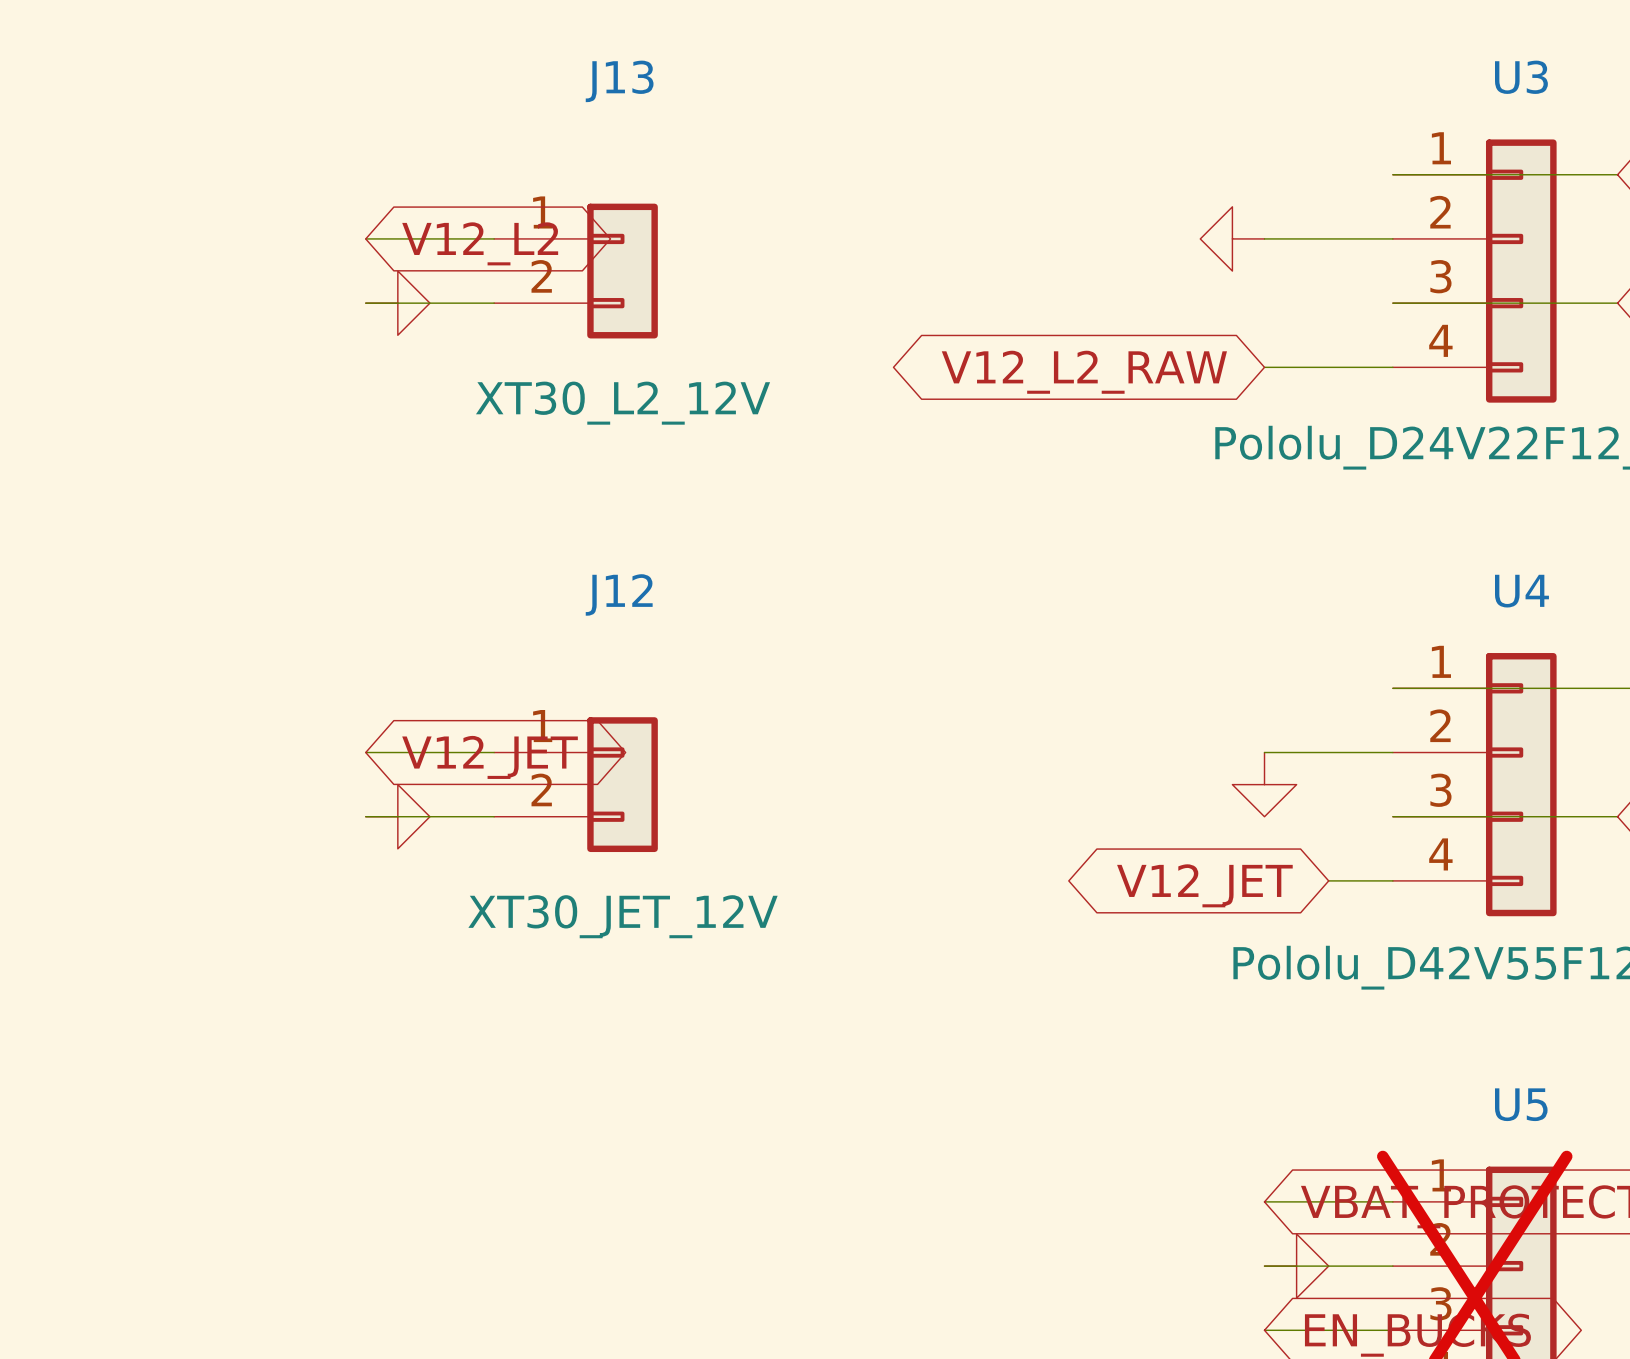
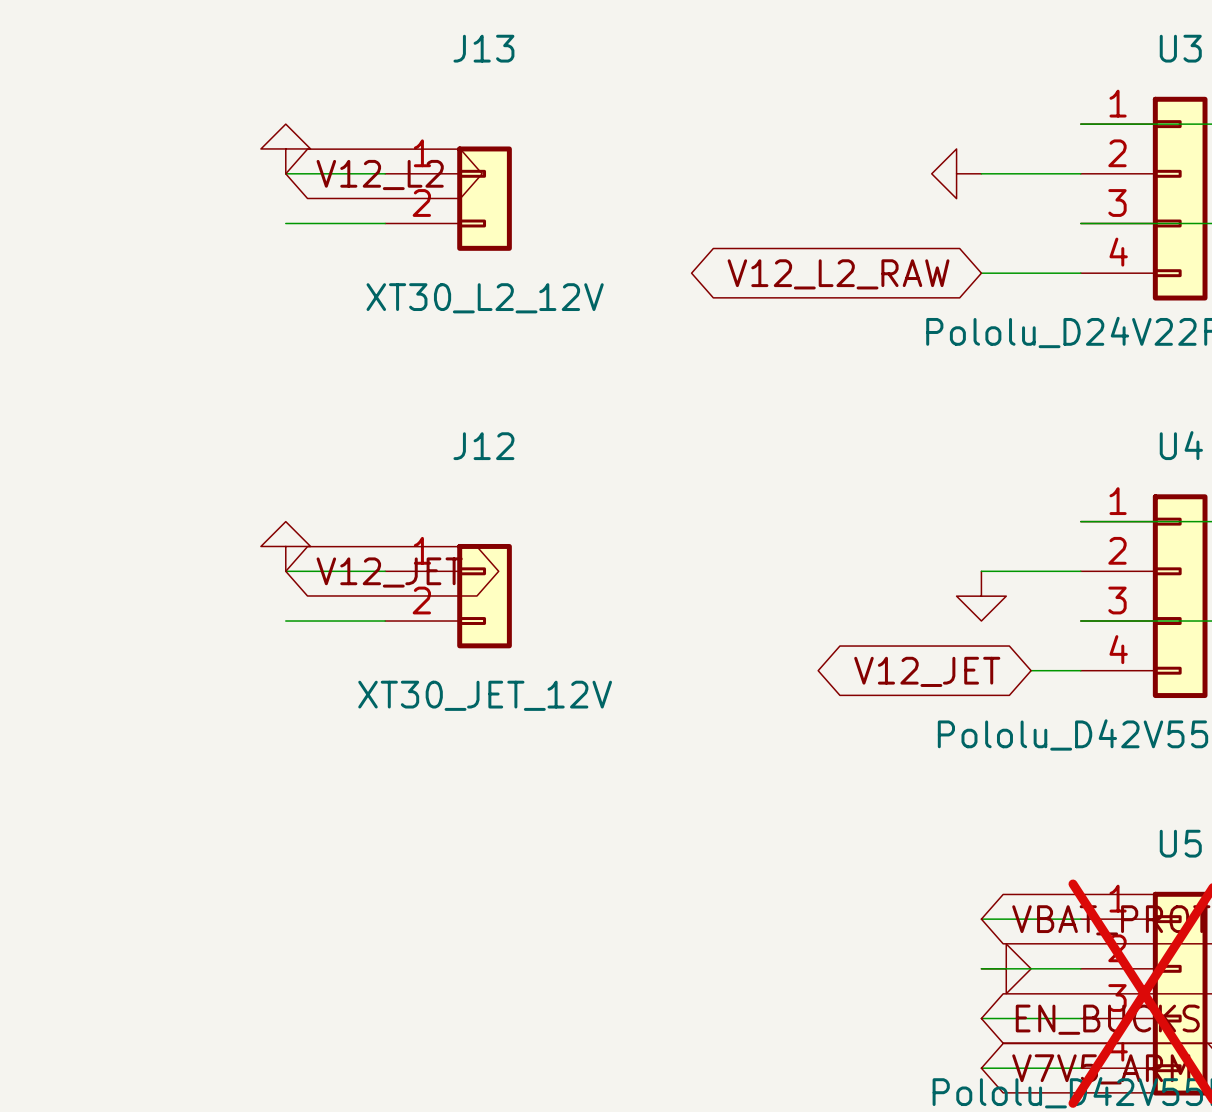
power symbol rotation: 0° (397, 303) -> 90° counterclockwise (285, 148)
power symbol position: (397, 303) -> (285, 148)
power symbol rotation: 0° (397, 816) -> 90° counterclockwise (285, 546)
power symbol position: (397, 816) -> (285, 546)

